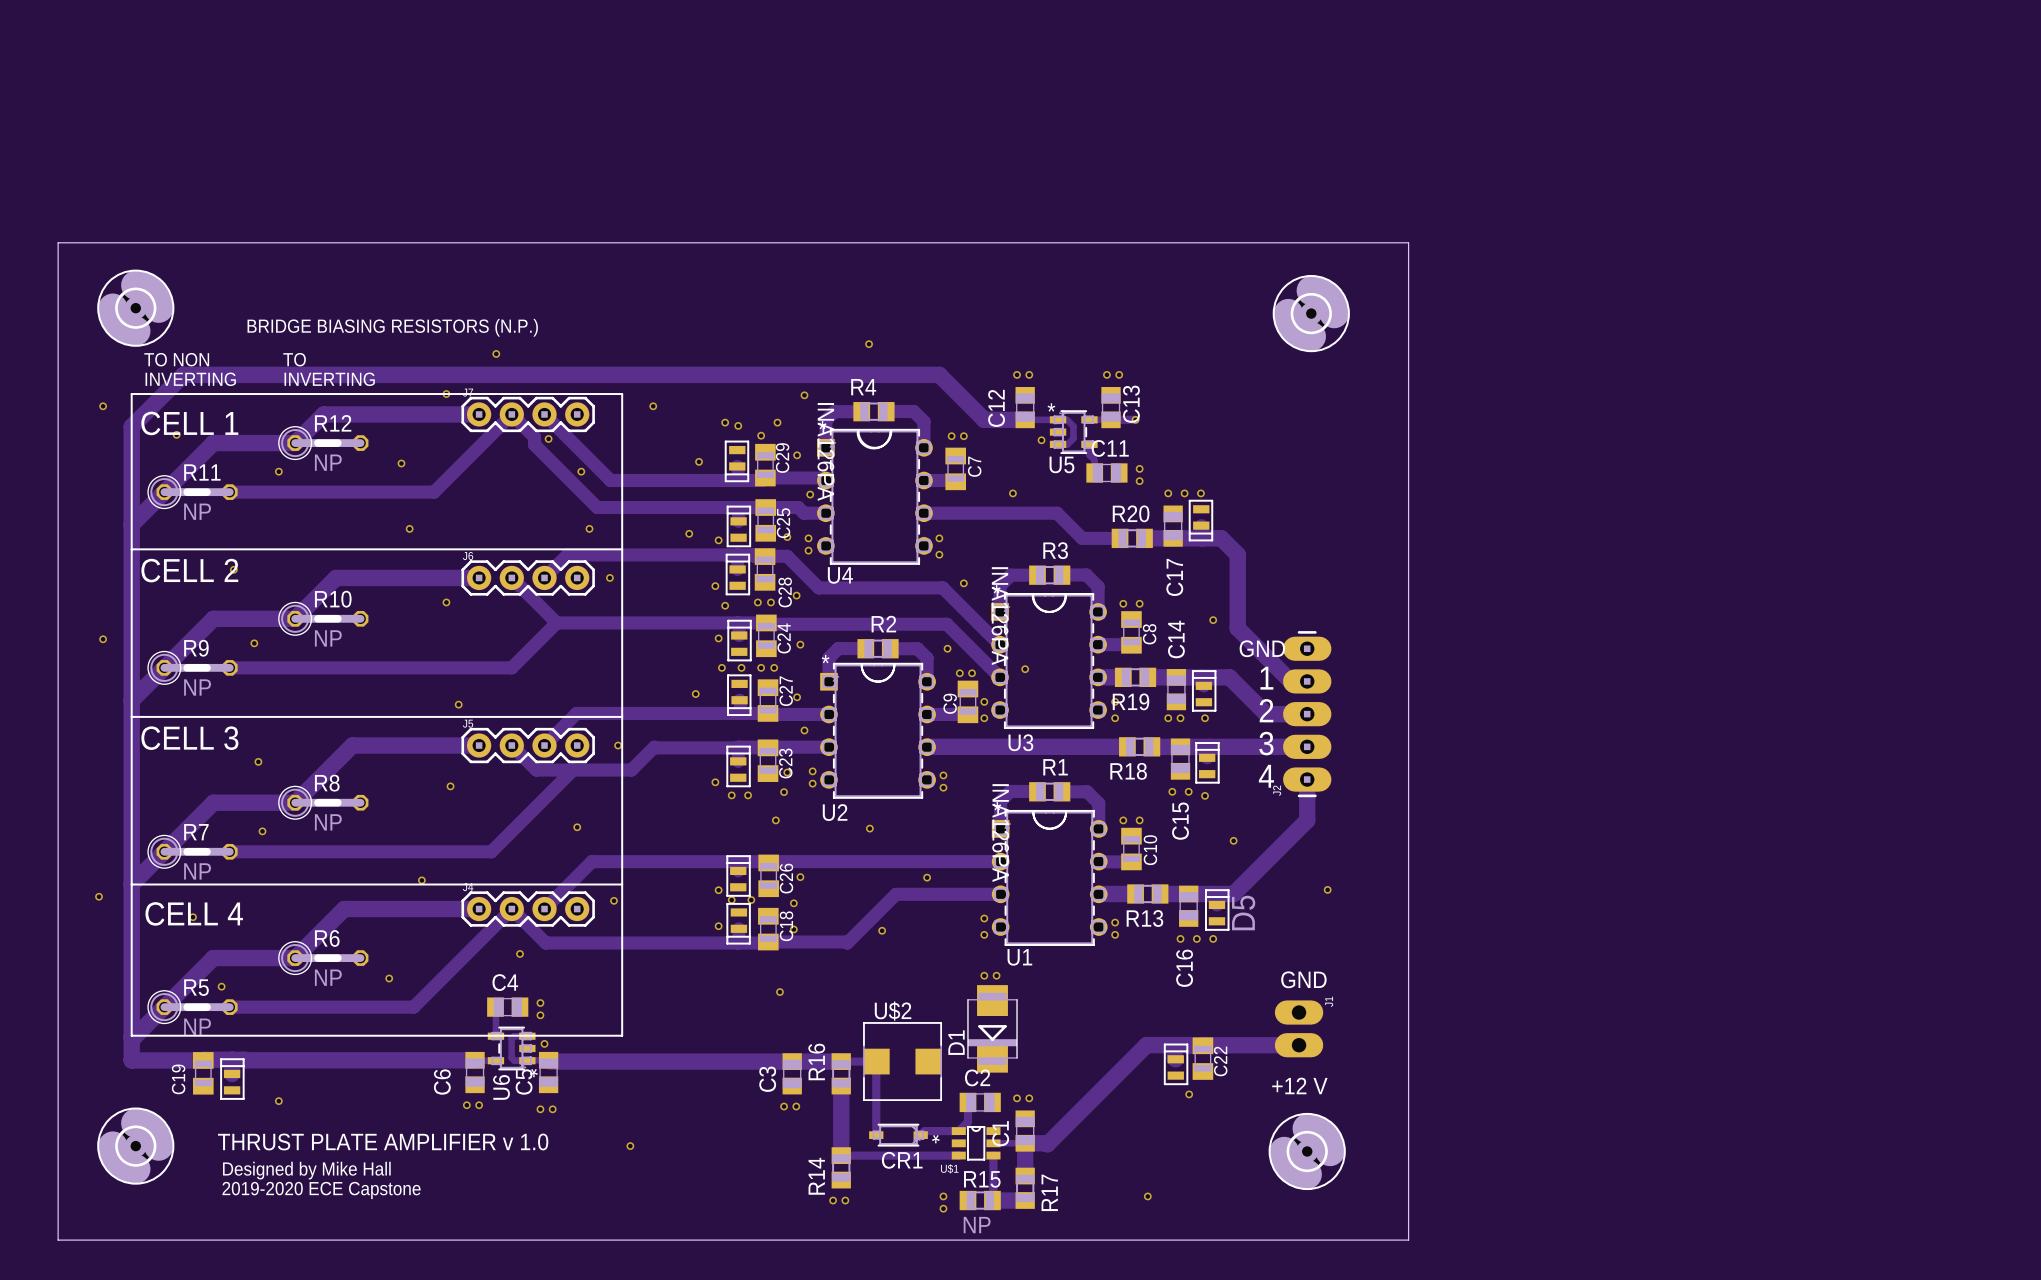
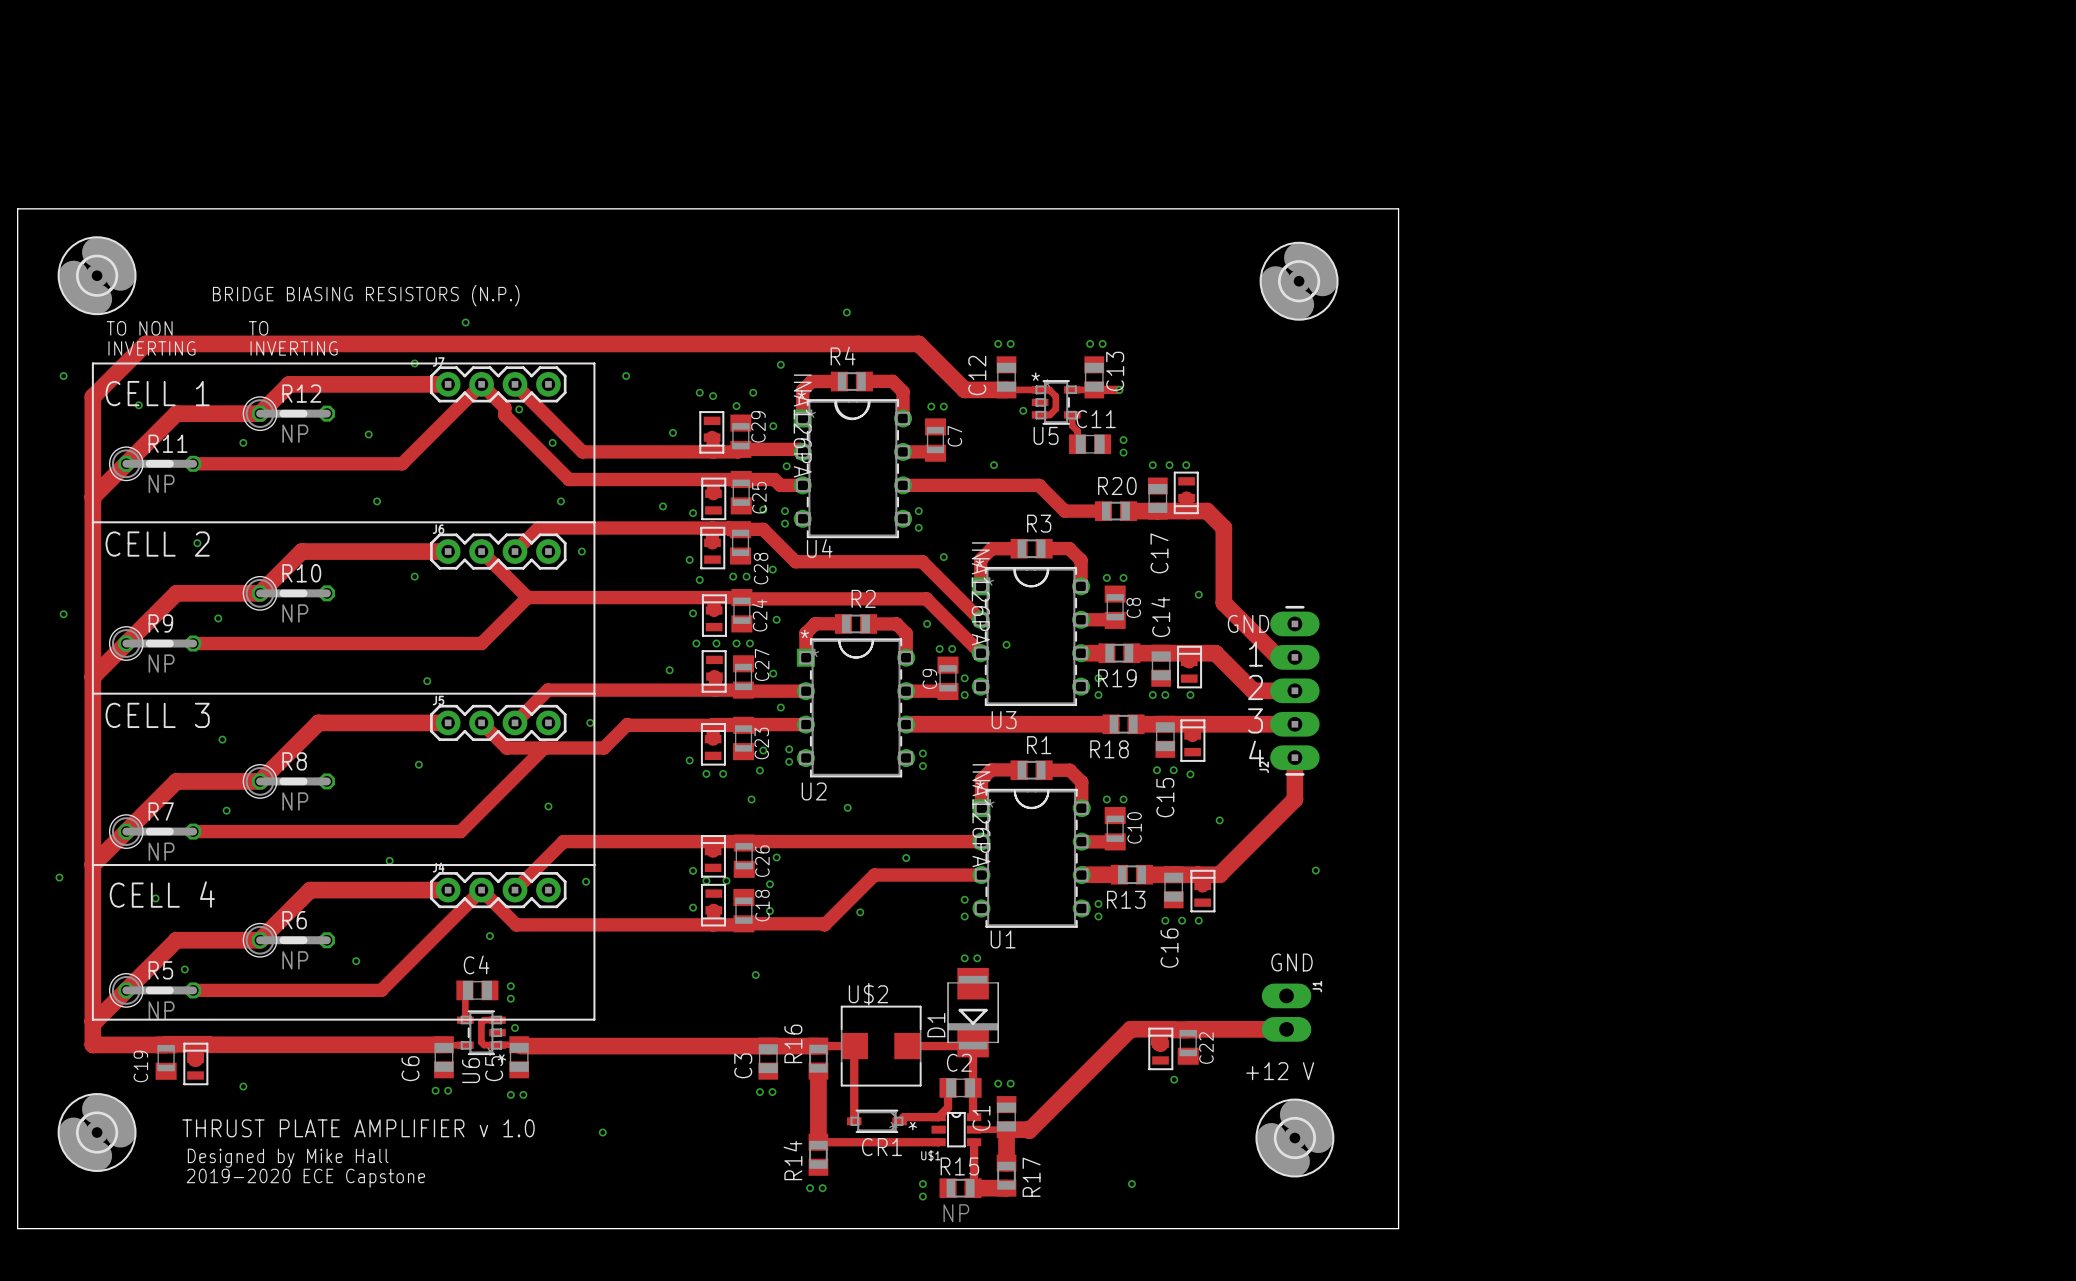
part text: D5 (1243, 912) -> none
track: none -> (973, 1041) (974, 1117)
track: none -> (907, 1046) (968, 1046)

